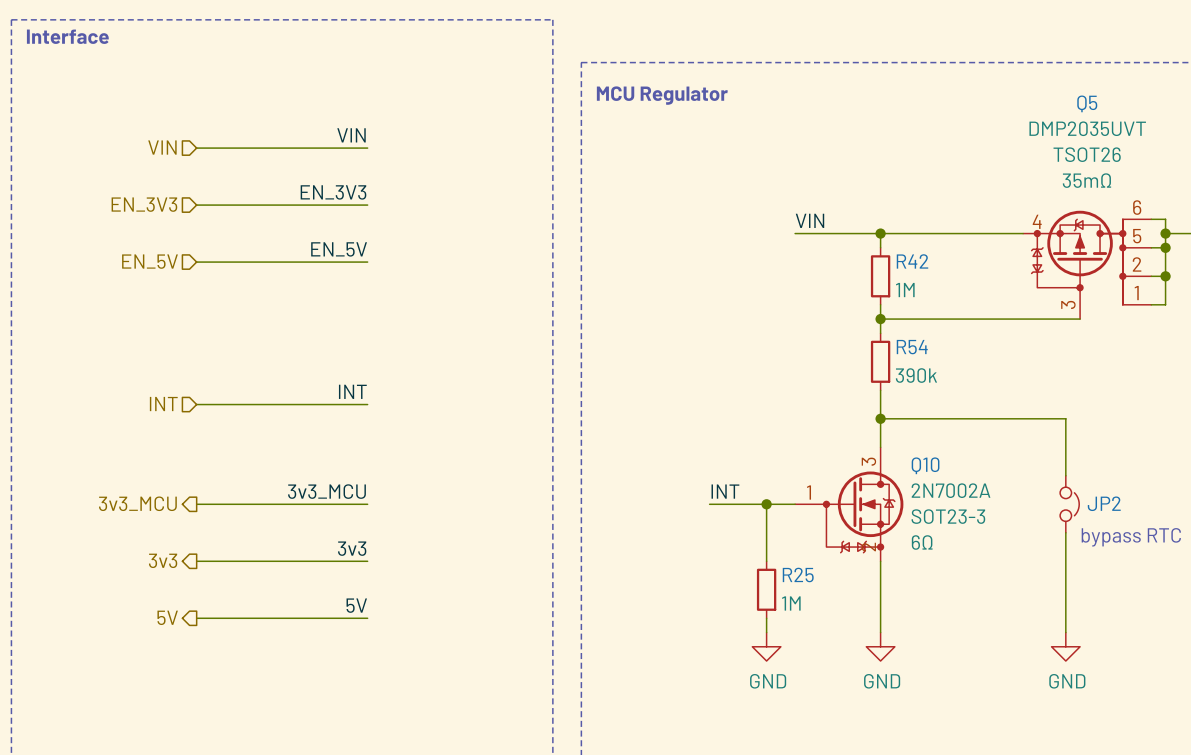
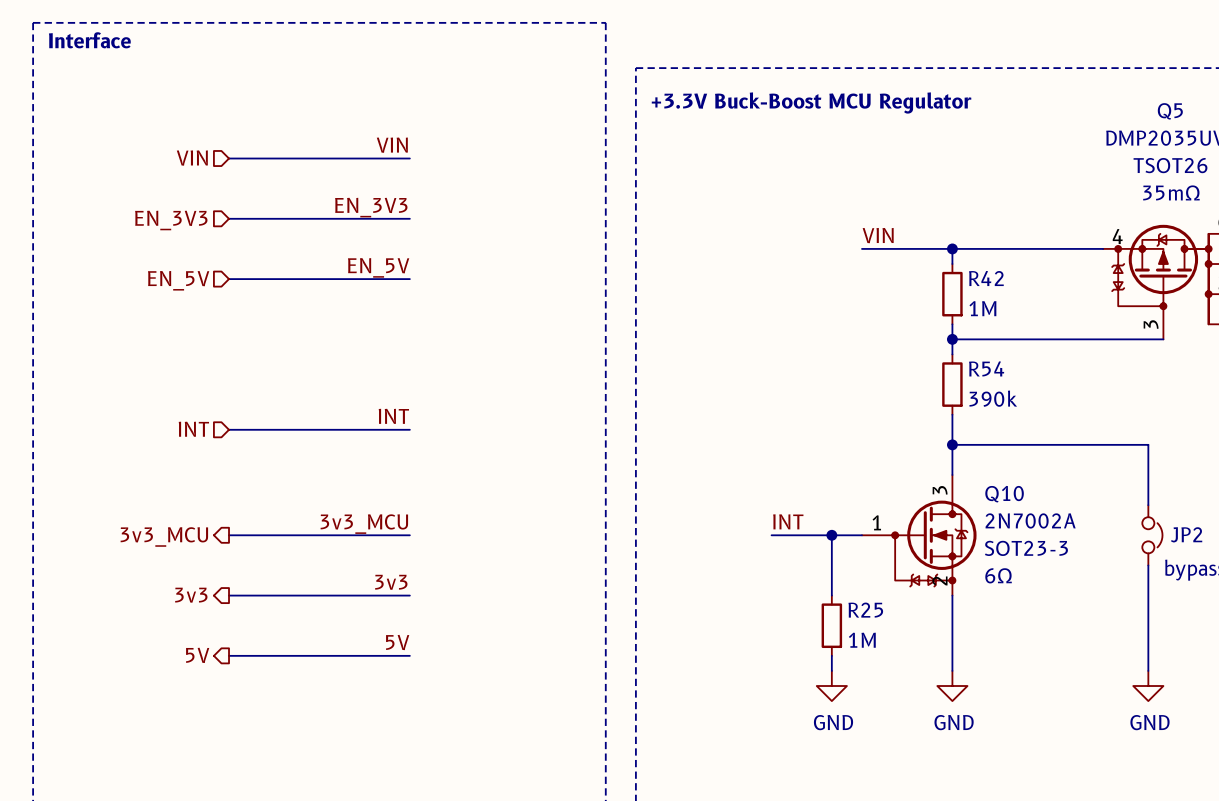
text: MCU Regulator (662, 95) -> +3.3V Buck-Boost MCU Regulator (811, 102)

